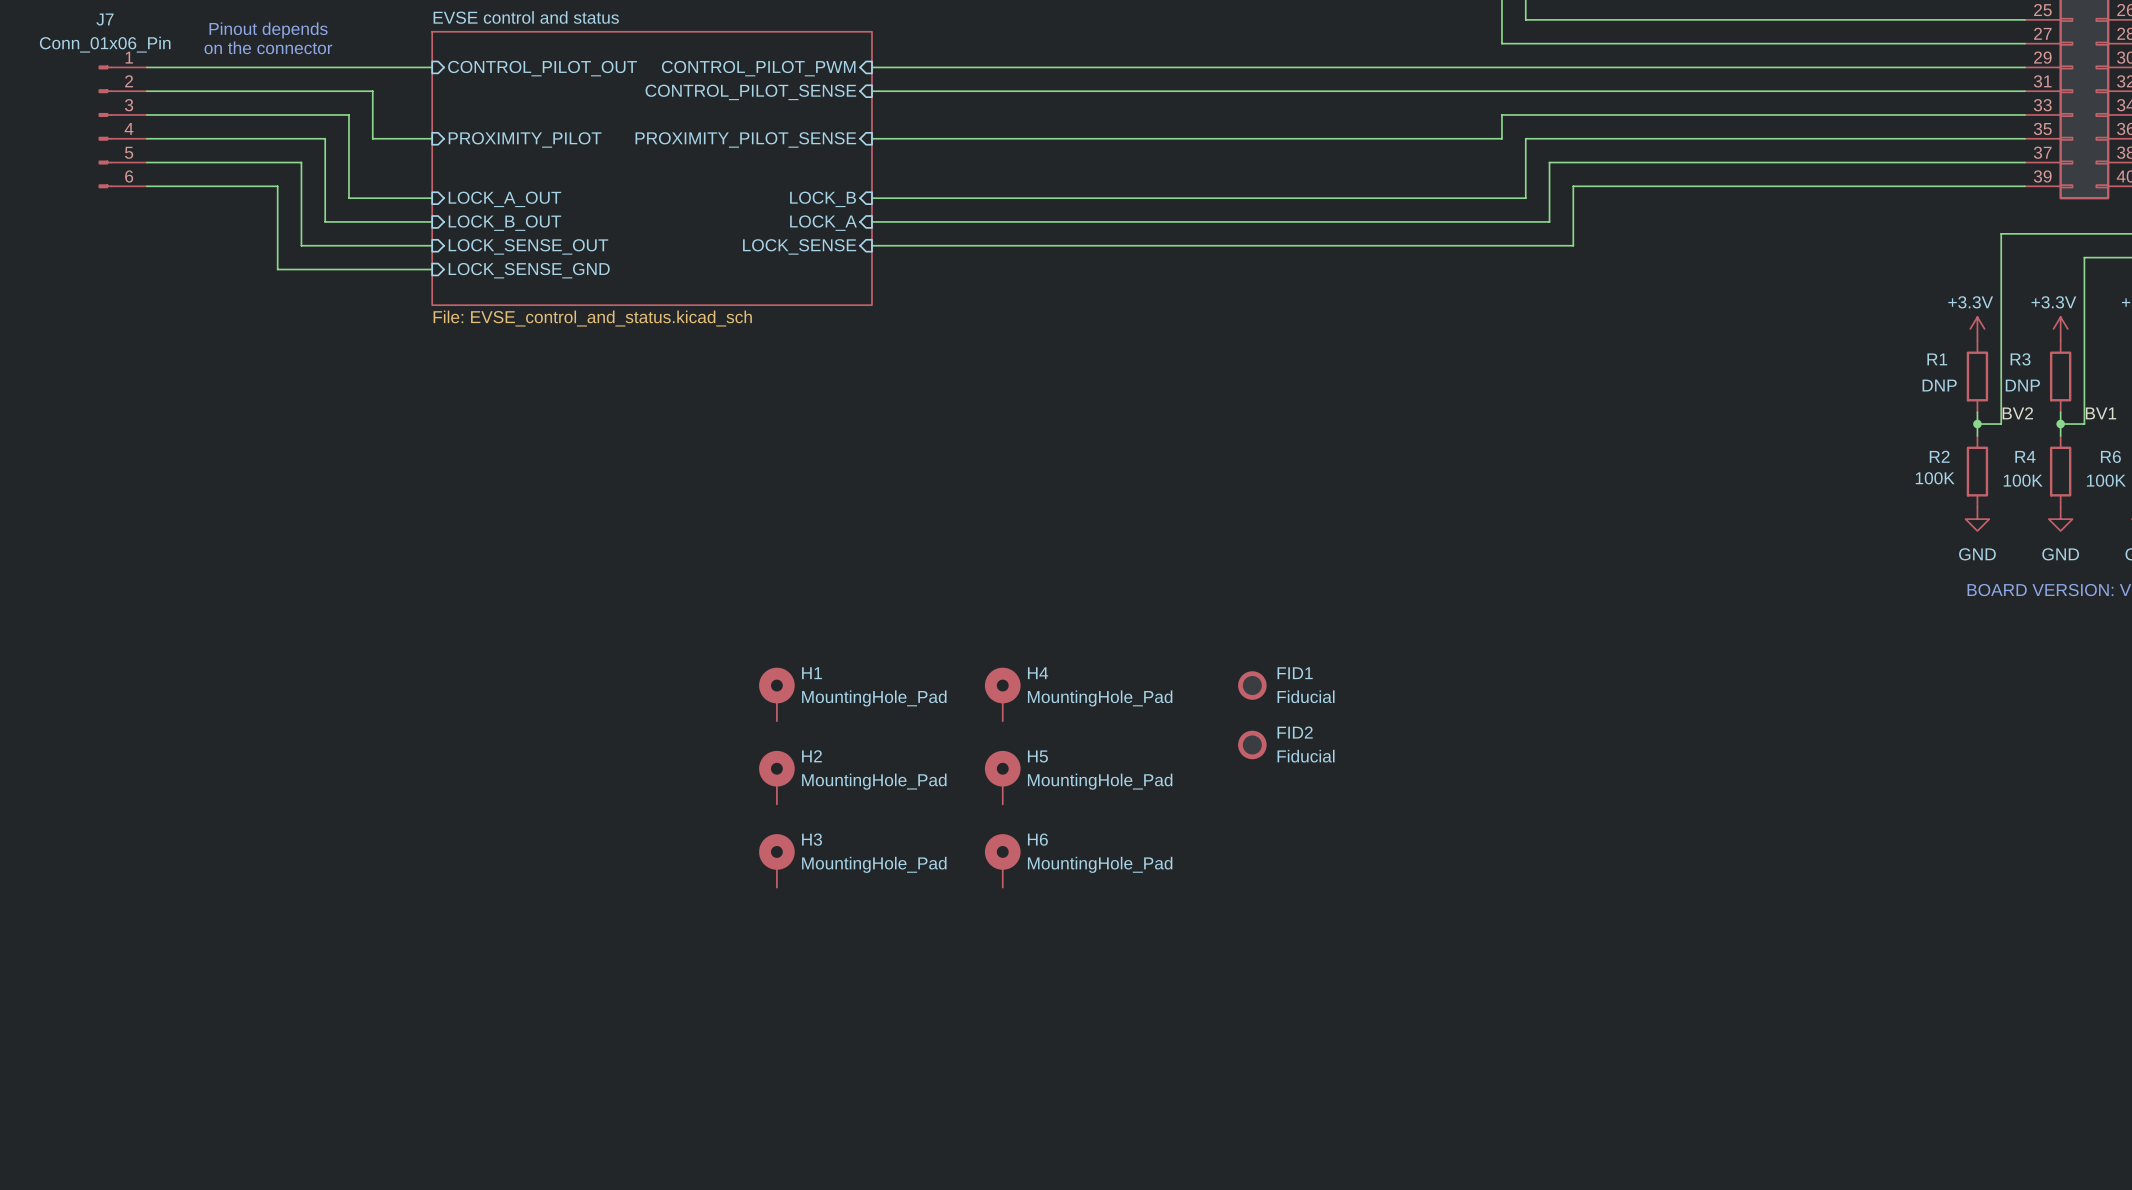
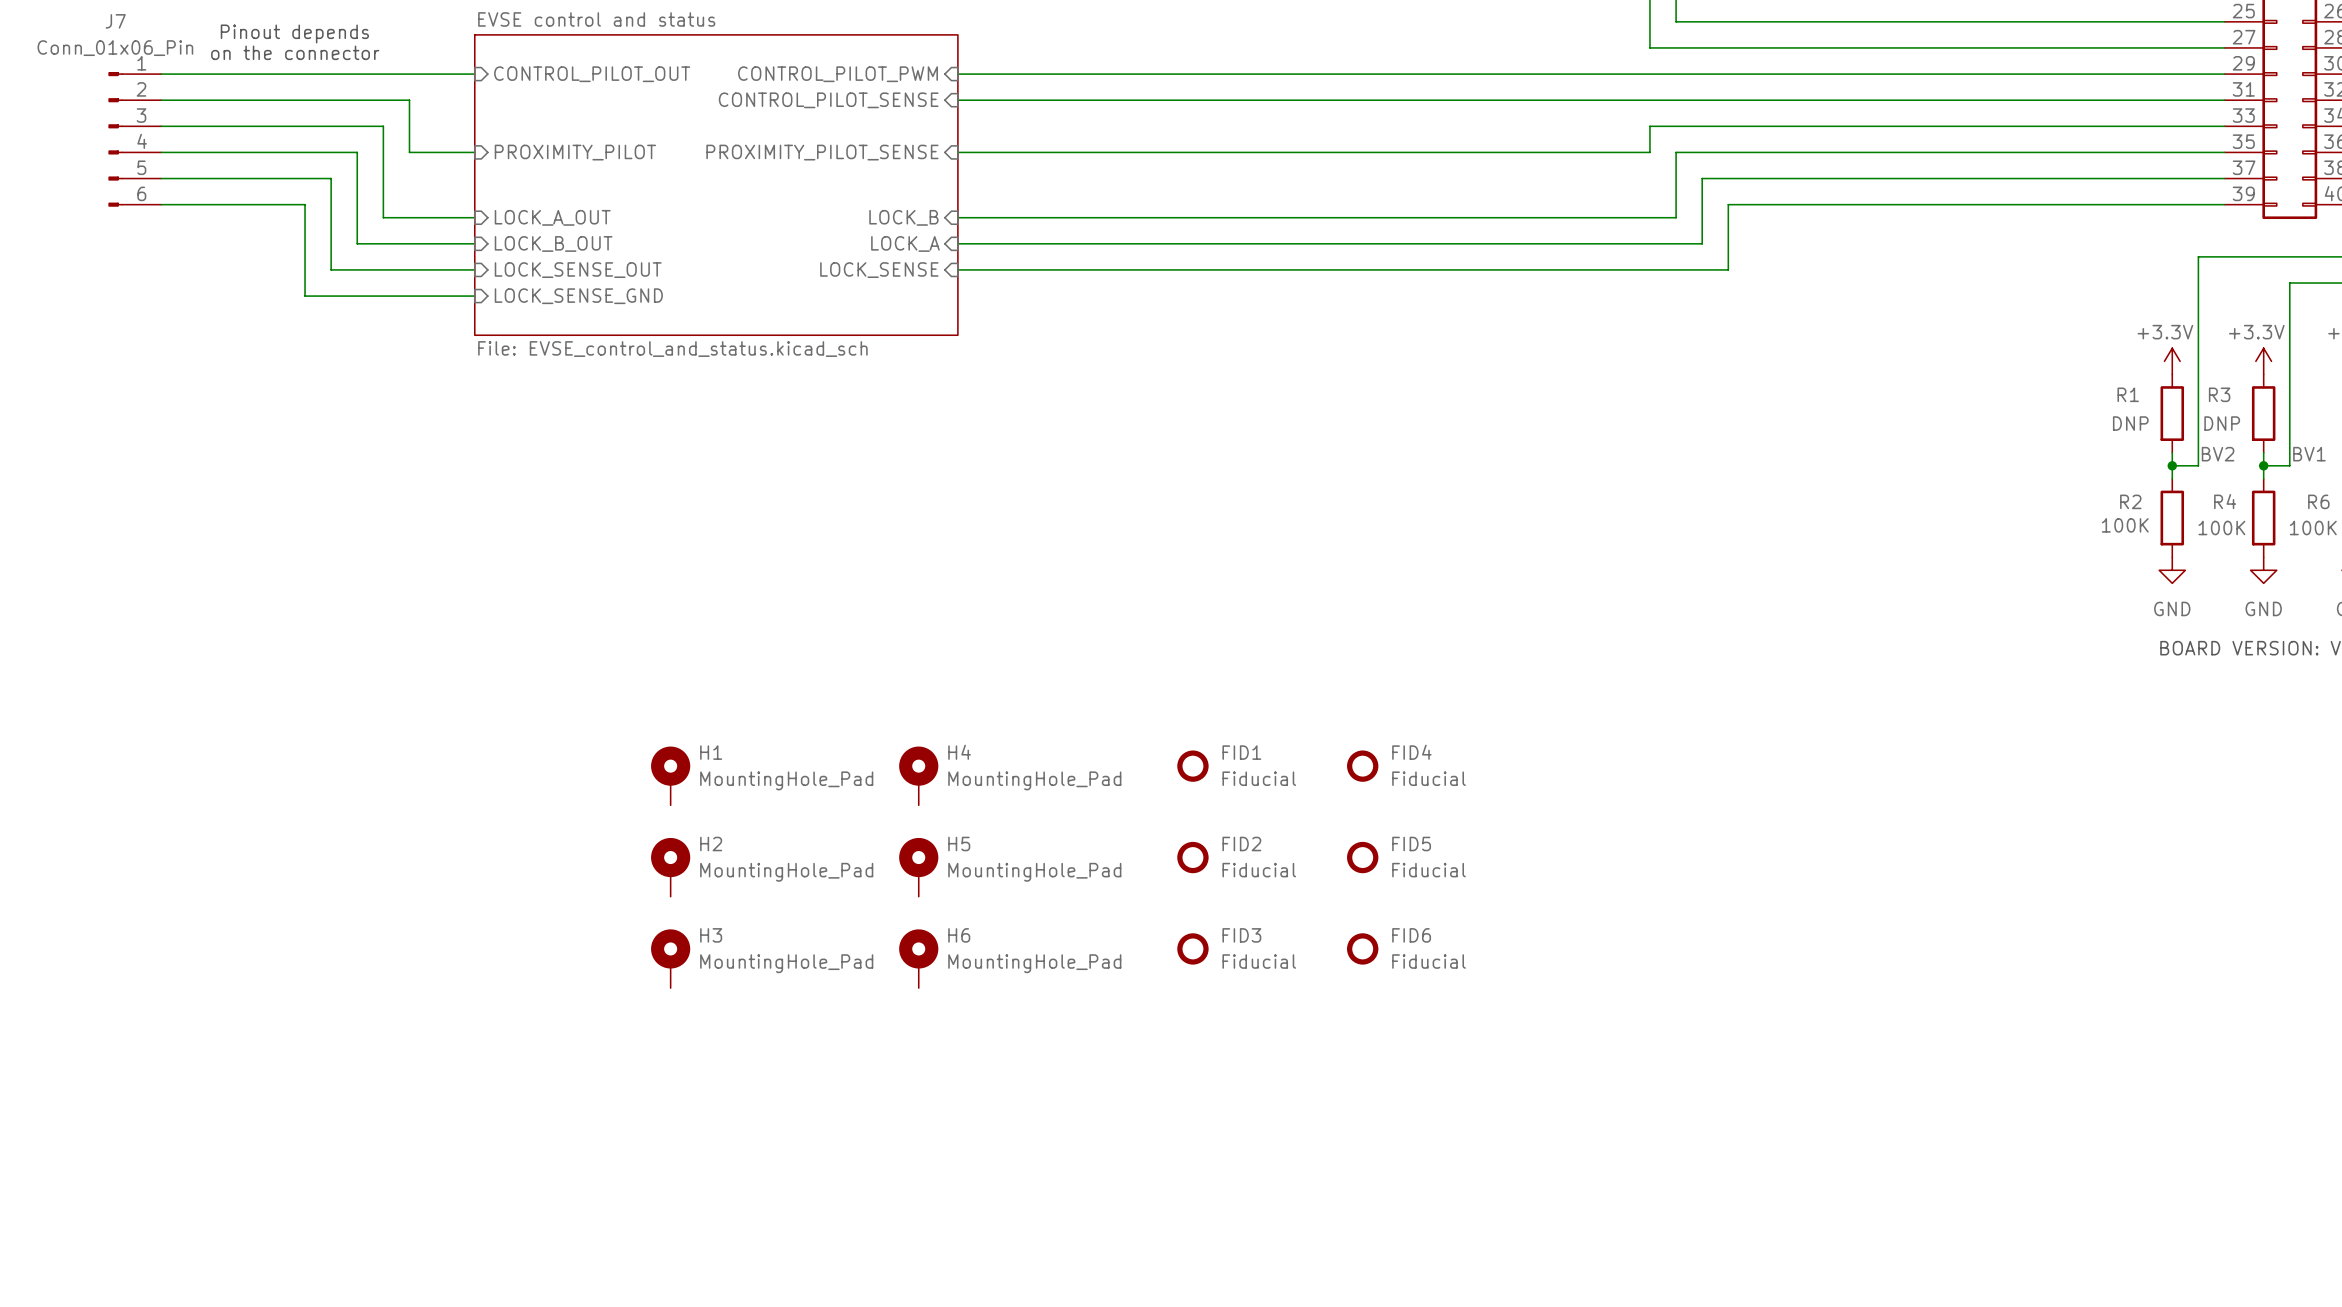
FID1 position: (1252, 685) -> (1192, 766)
H1 position: (776, 694) -> (670, 775)
H4 position: (1002, 694) -> (918, 775)
FID4: none -> Fiducial (1362, 766)
FID2 position: (1252, 744) -> (1192, 857)
H2 position: (776, 777) -> (670, 867)
H5 position: (1002, 777) -> (918, 867)
FID5: none -> Fiducial (1362, 857)
H3 position: (776, 860) -> (670, 958)
H6 position: (1002, 860) -> (918, 958)
FID3: none -> Fiducial (1192, 948)
FID6: none -> Fiducial (1362, 948)

